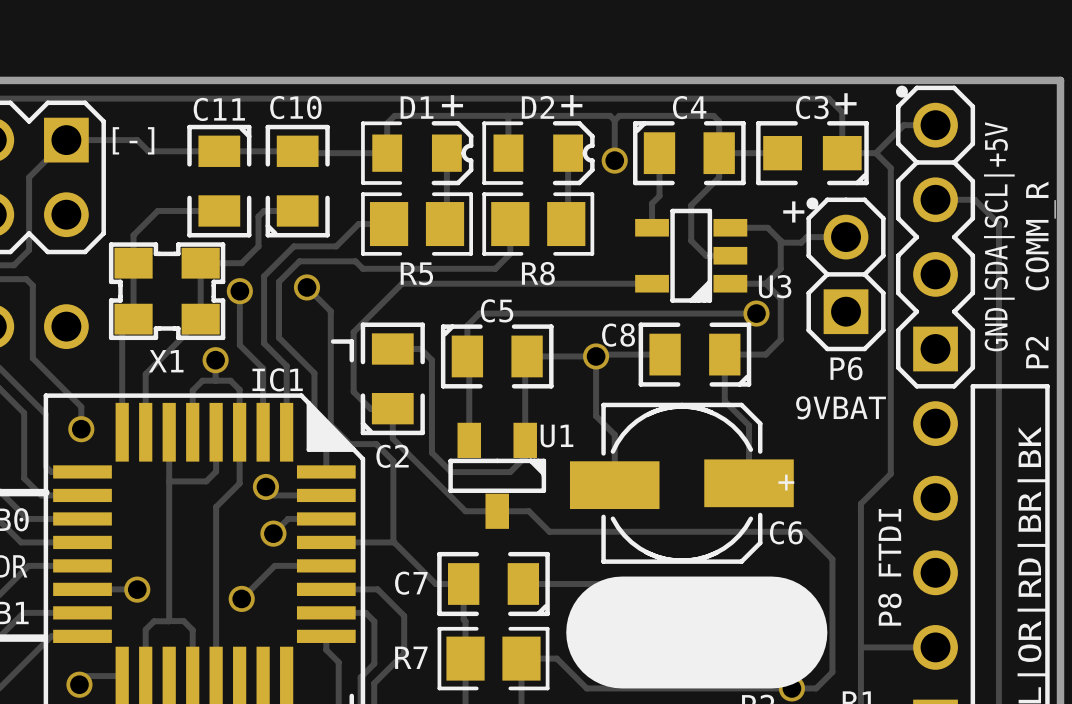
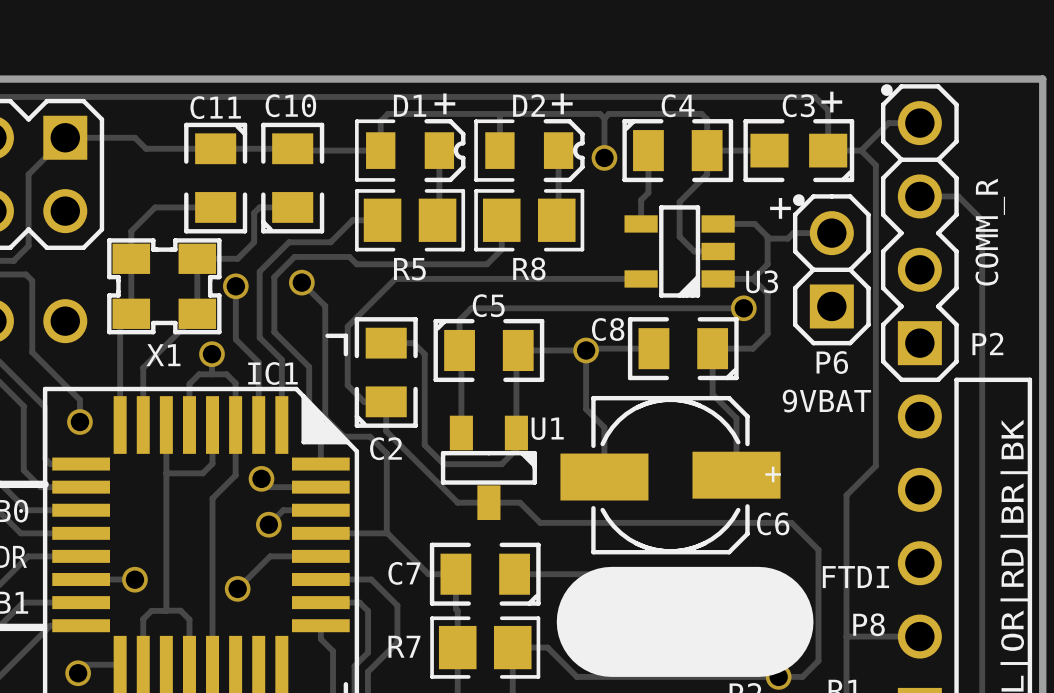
text: [-] (133, 140) -> none
text: GND|SDA|SCL|+5V (999, 236) -> none
P2 value position: COMM_R (1040, 236) -> COMM_R (990, 232)
P2 name rotation: 0° (1037, 352) -> 90° clockwise (987, 343)
P8 value rotation: 0° (889, 542) -> 90° clockwise (855, 577)
P8 name rotation: 0° (889, 609) -> 90° clockwise (869, 624)

